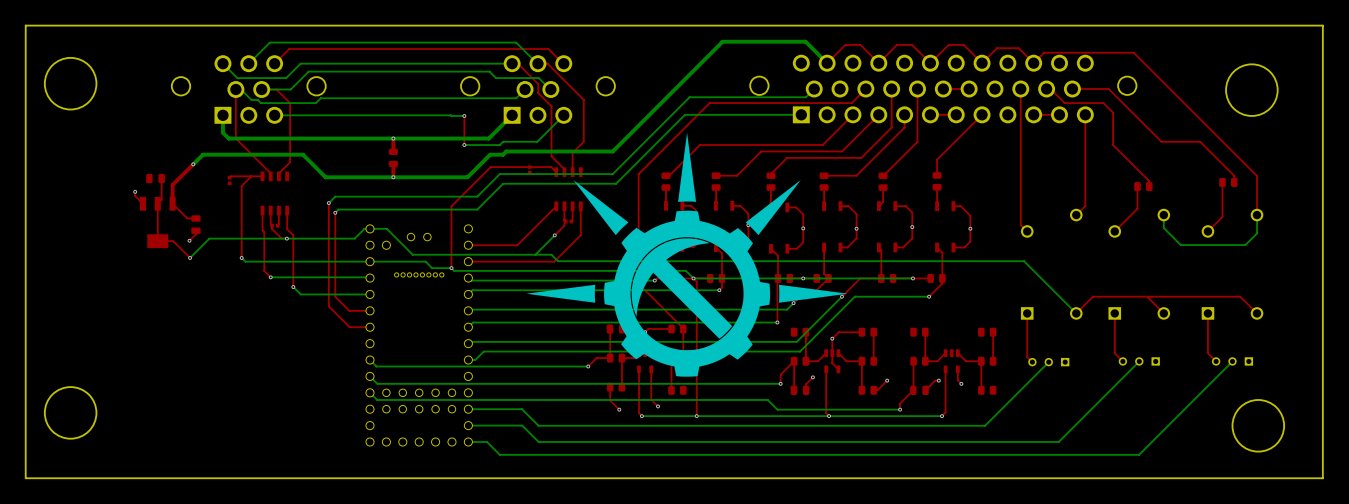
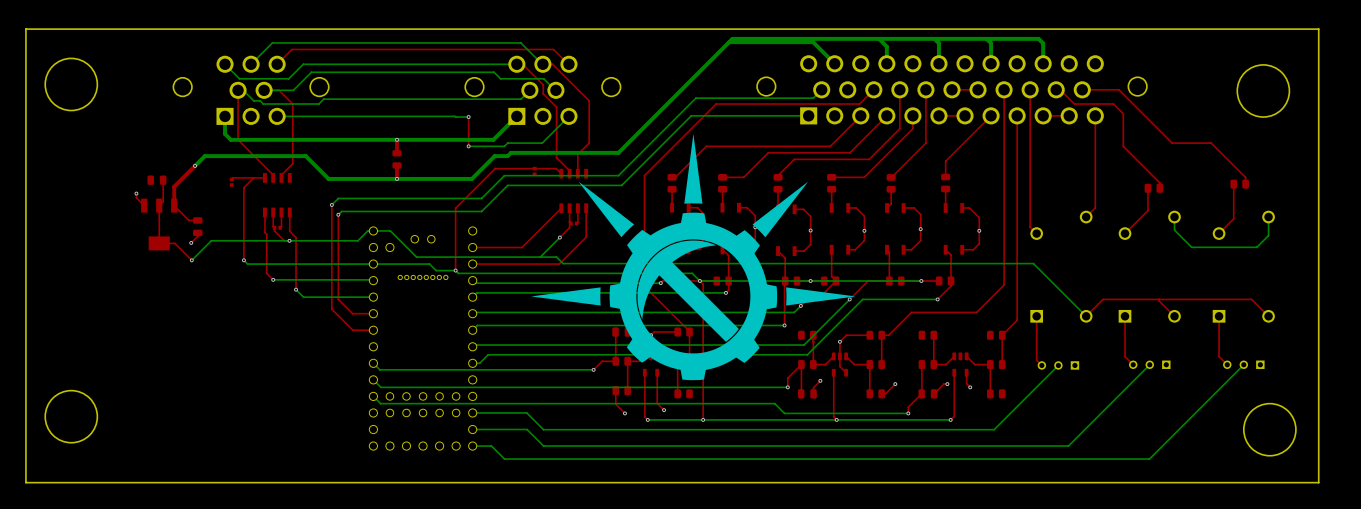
board edge: (25, 28) (25, 25) (1322, 25) (1322, 478) (1306, 478) -> (25, 29) (1318, 29) (1318, 482)
bottom track: none -> (879, 38) (886, 46) (886, 63)
bottom track: none -> (934, 38) (938, 43) (938, 63)
bottom track: none -> (986, 38) (991, 43) (991, 63)
bottom track: none -> (729, 42) (732, 38) (1038, 38) (1043, 43) (1043, 63)
top track: (827, 63) (845, 44) (860, 44) (878, 63) (896, 44) (912, 44) (930, 63) (948, 44) (963, 44) (982, 63) (997, 48) (1018, 48) (1033, 63) (1044, 52) (1133, 52) (1257, 176) (1257, 215) -> none
top track: none -> (1004, 89) (1004, 285) (976, 312) (911, 312) (888, 335) (881, 335)
top track: none -> (1017, 115) (1017, 320) (1002, 335)

